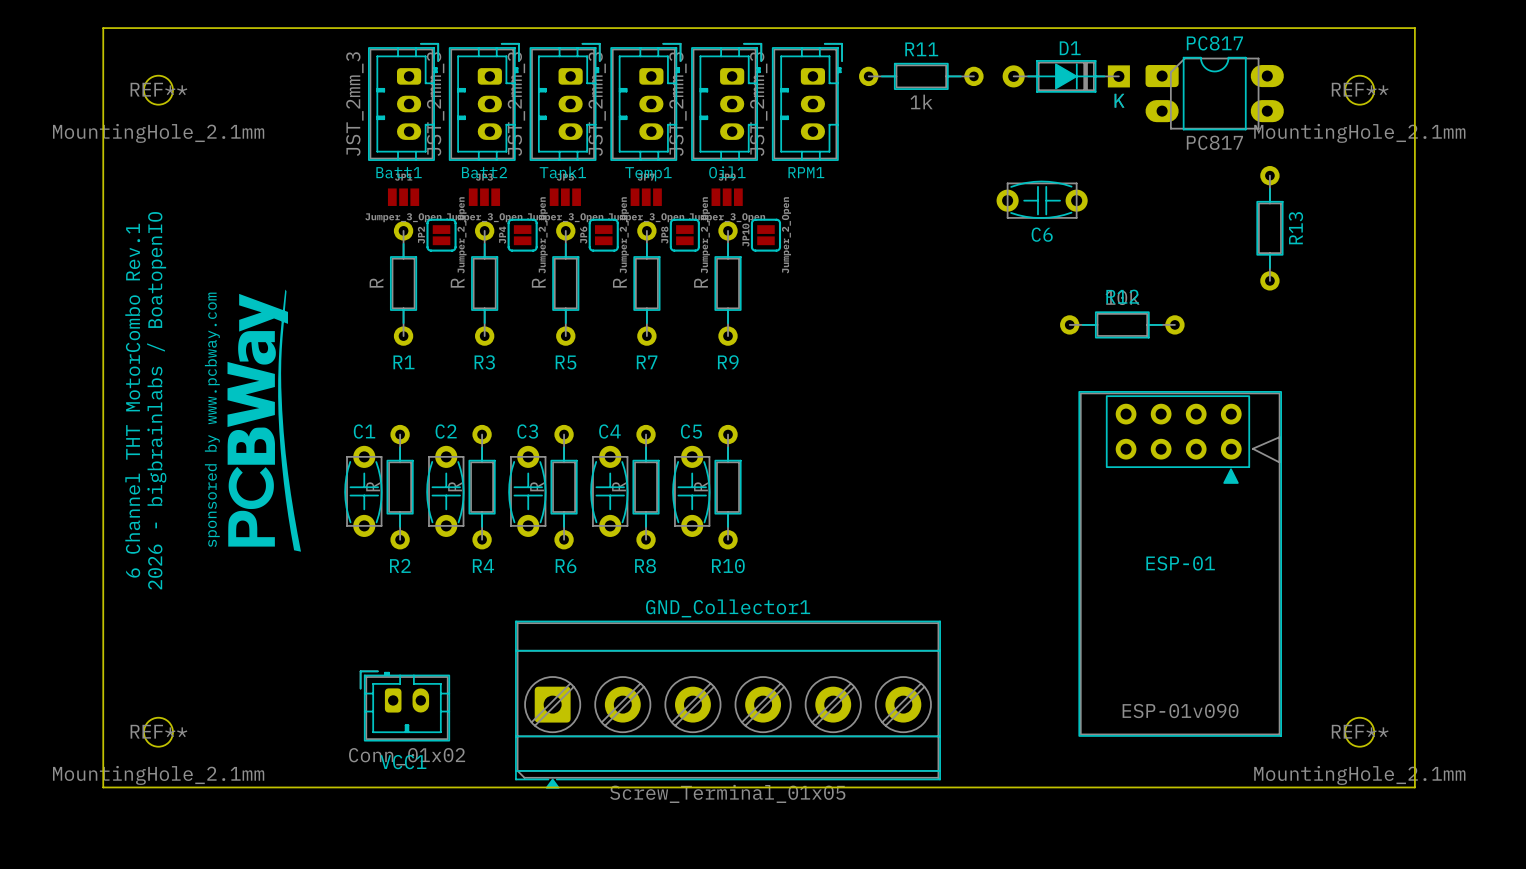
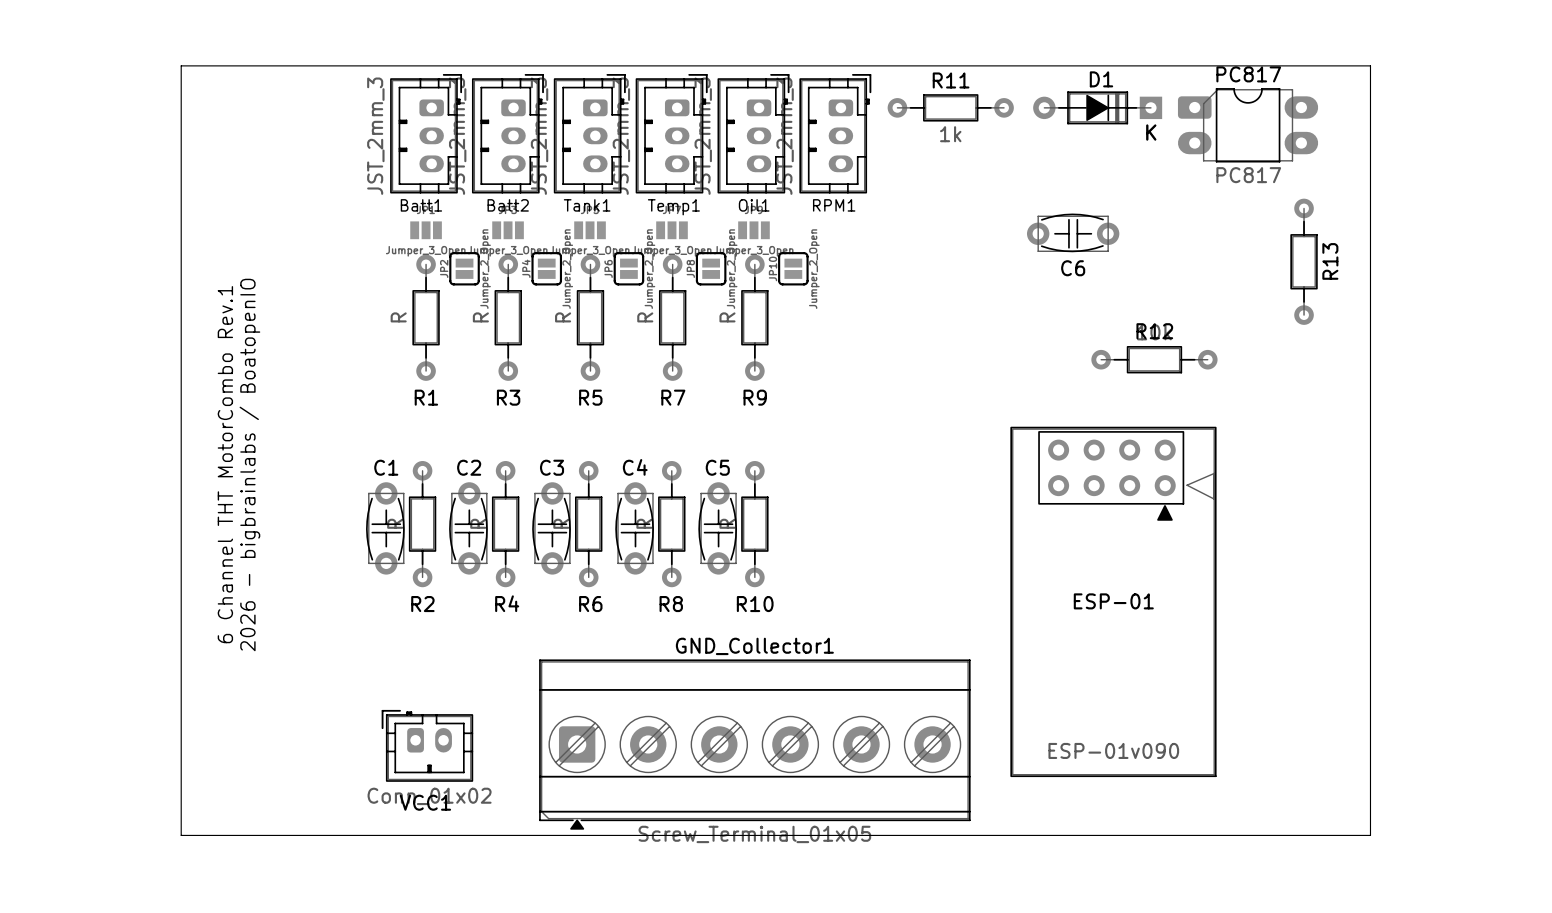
board edge: (103, 28) (1414, 28) (1414, 787) (103, 787) (103, 28) -> (181, 65) (181, 835) (1370, 835) (1370, 65) (181, 65)
REF**: MountingHole_2.1mm (158, 90) -> none
REF**: MountingHole_2.1mm (1359, 90) -> none
drawing: [227, 289, 301, 552] -> none
text position: 6 Channel THT MotorCombo Rev.1 (132, 400) -> 6 Channel THT MotorCombo Rev.1 (225, 464)
text position: 2026 - bigbrainlabs / BoatopenIO (156, 400) -> 2026 - bigbrainlabs / BoatopenIO (249, 464)
text: sponsored by www.pcbway.com (212, 419) -> none
ESP-01 position: (1180, 563) -> (1113, 601)
REF**: MountingHole_2.1mm (158, 732) -> none
REF**: MountingHole_2.1mm (1359, 732) -> none

